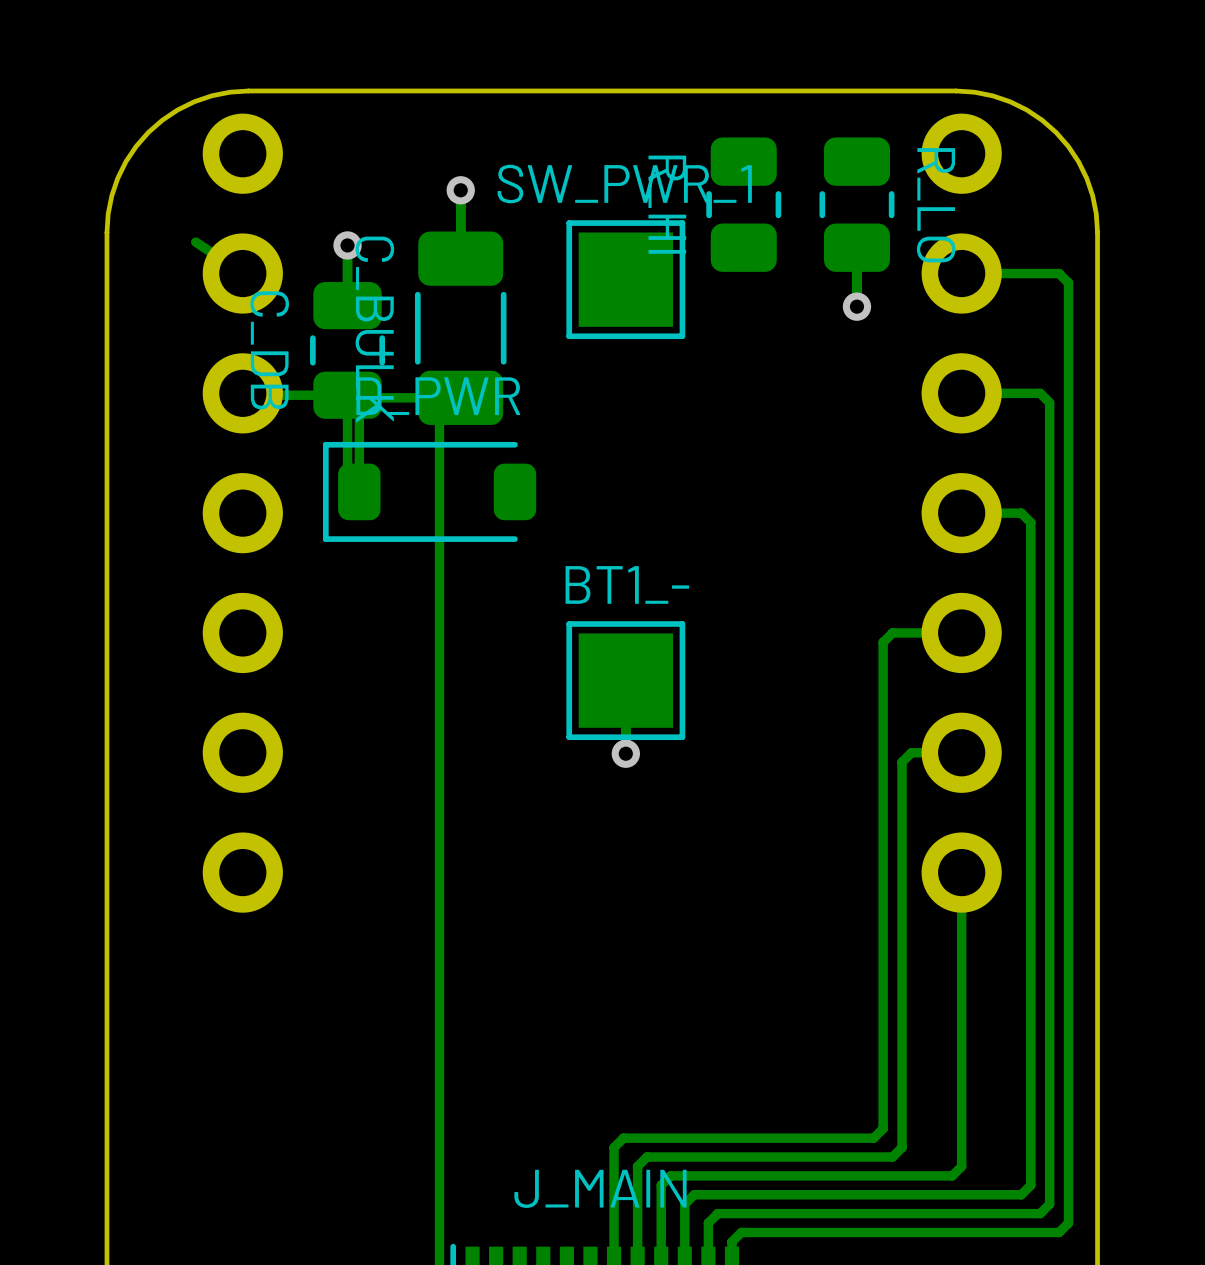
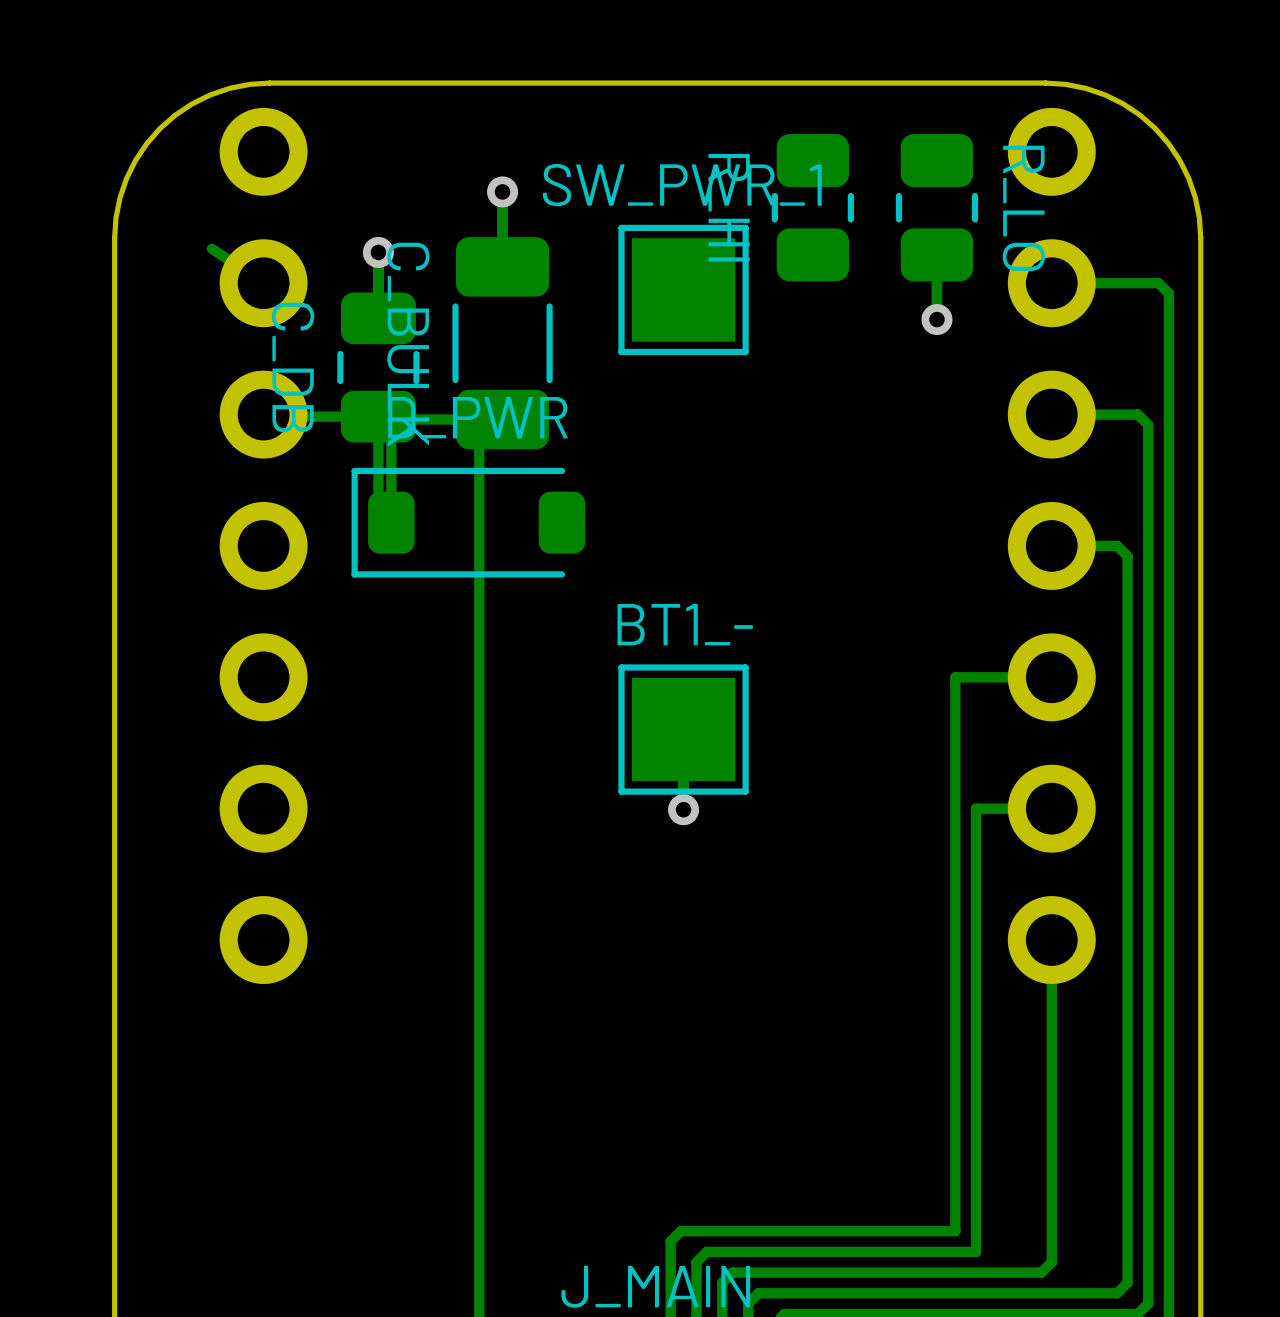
bottom track: (892, 632) (883, 642) (883, 1128) (873, 1138) -> (976, 677) (955, 677) (955, 1231)
bottom track: (911, 752) (902, 762) (902, 1147) (892, 1157) -> (996, 808) (976, 808) (976, 1251)

